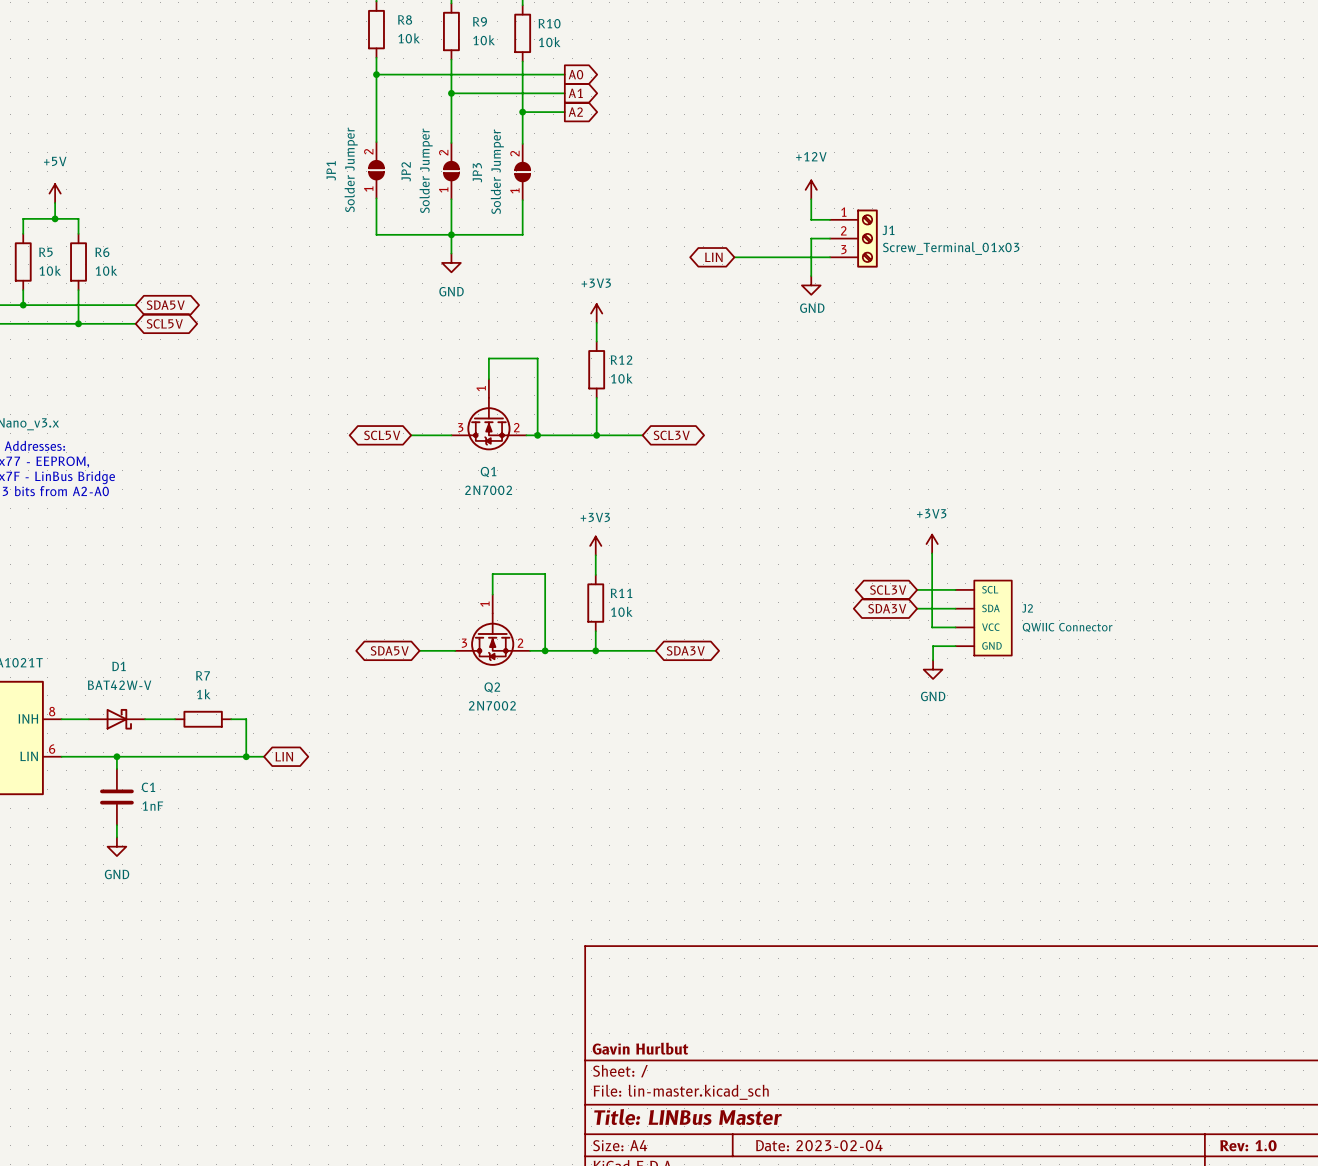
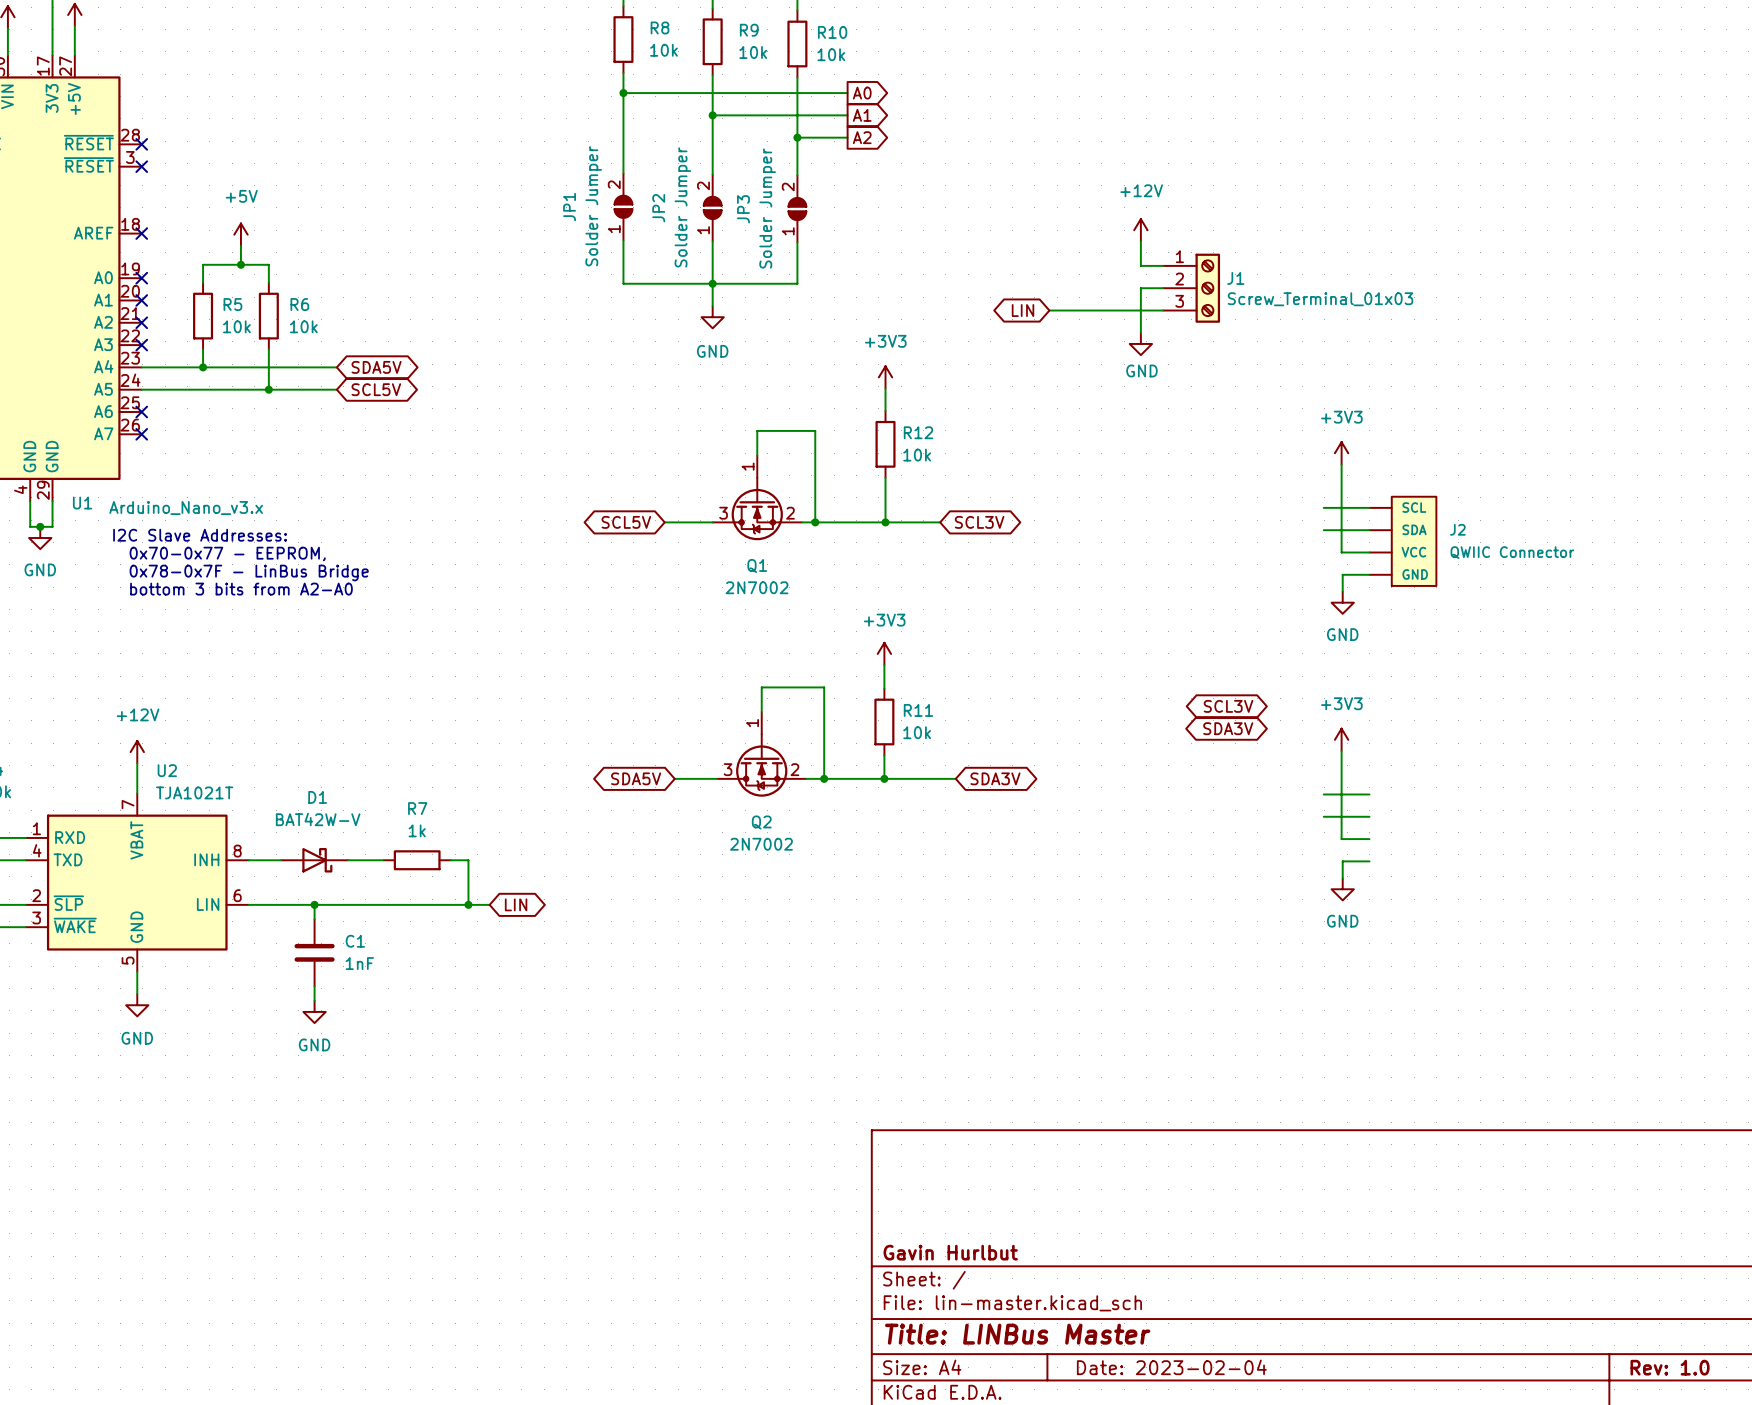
power symbol: none -> +3V3 (1341, 453)
wire: none -> (1341, 464) (1341, 552) (1369, 552)
wire: none -> (1323, 507) (1369, 507)
wire: none -> (1323, 530) (1369, 530)
wire: none -> (1369, 574) (1342, 574) (1342, 591)
power symbol: none -> GND (1342, 602)
power symbol: +3V3 (932, 544) -> none
wire: (932, 553) (932, 627) (955, 627) -> (1341, 750) (1341, 839) (1369, 839)
wire: (917, 589) (955, 589) -> (1323, 794) (1369, 794)
wire: (917, 608) (955, 608) -> (1323, 816) (1369, 816)
power symbol: none -> +3V3 (1341, 739)
J2 position: (983, 618) -> (1402, 541)
wire: (955, 646) (933, 646) (933, 660) -> (1369, 861) (1342, 861) (1342, 878)
power symbol: GND (933, 669) -> none
power symbol: none -> GND (1342, 889)

